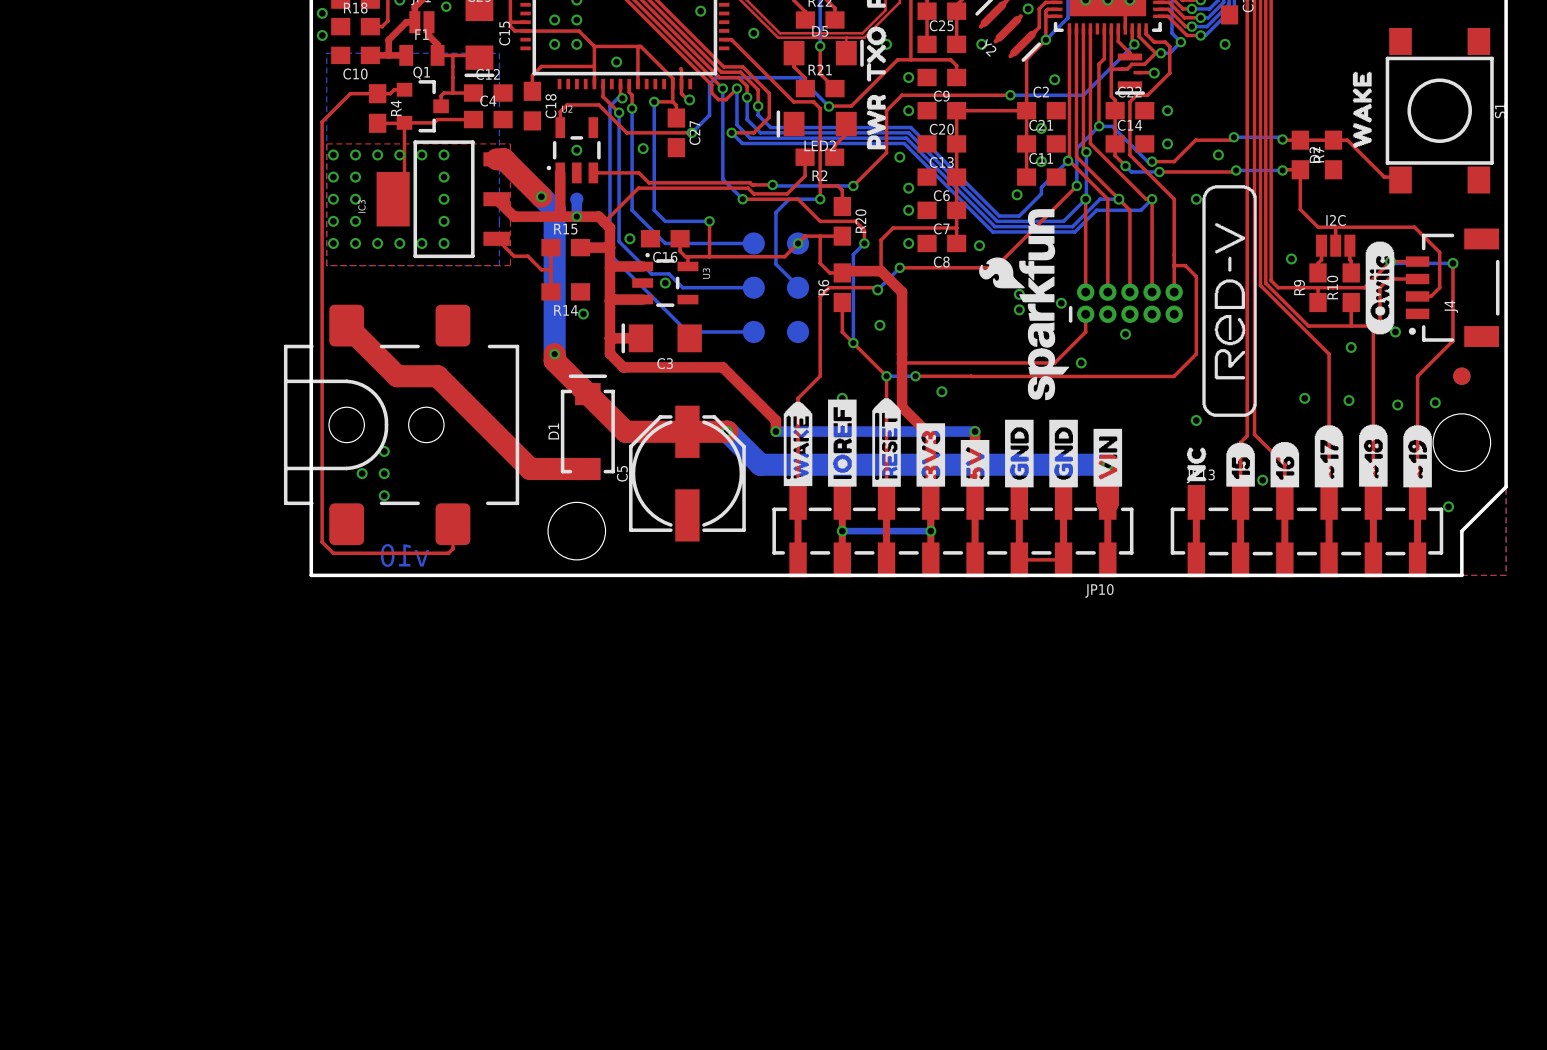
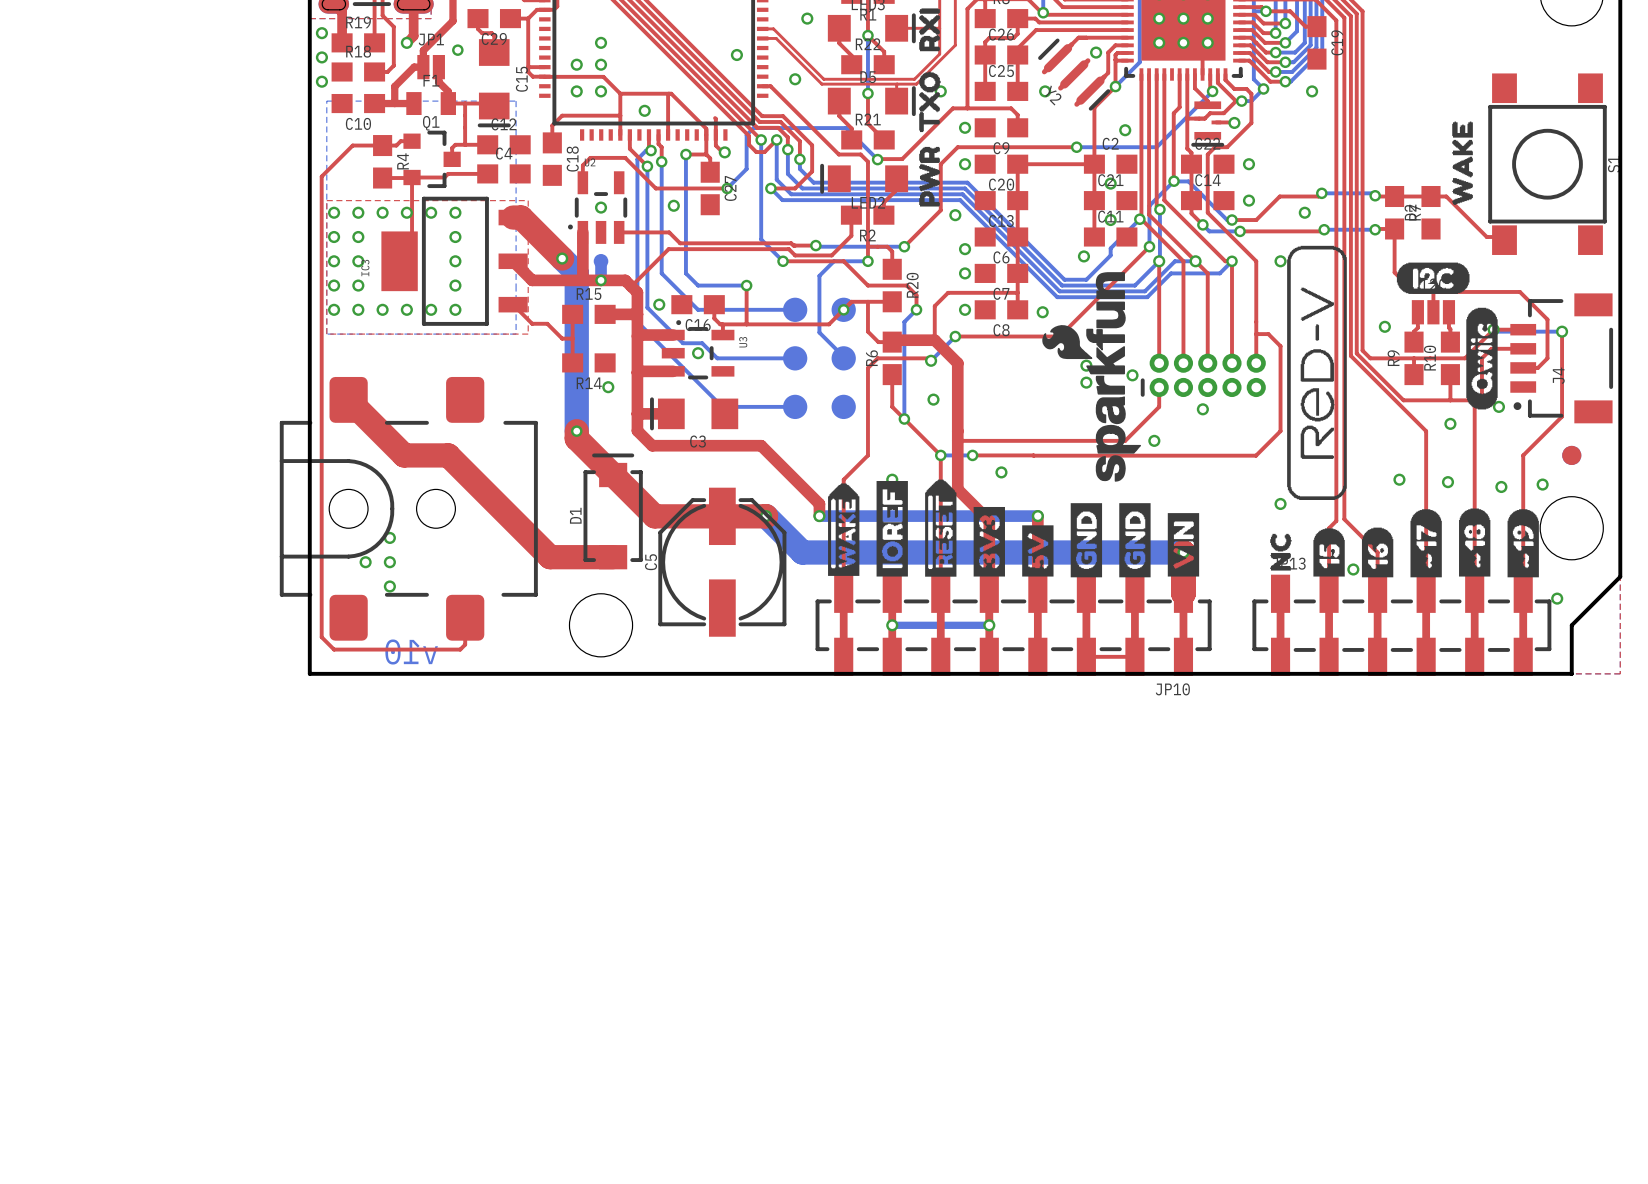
drawing: none -> [1396, 262, 1470, 294]

